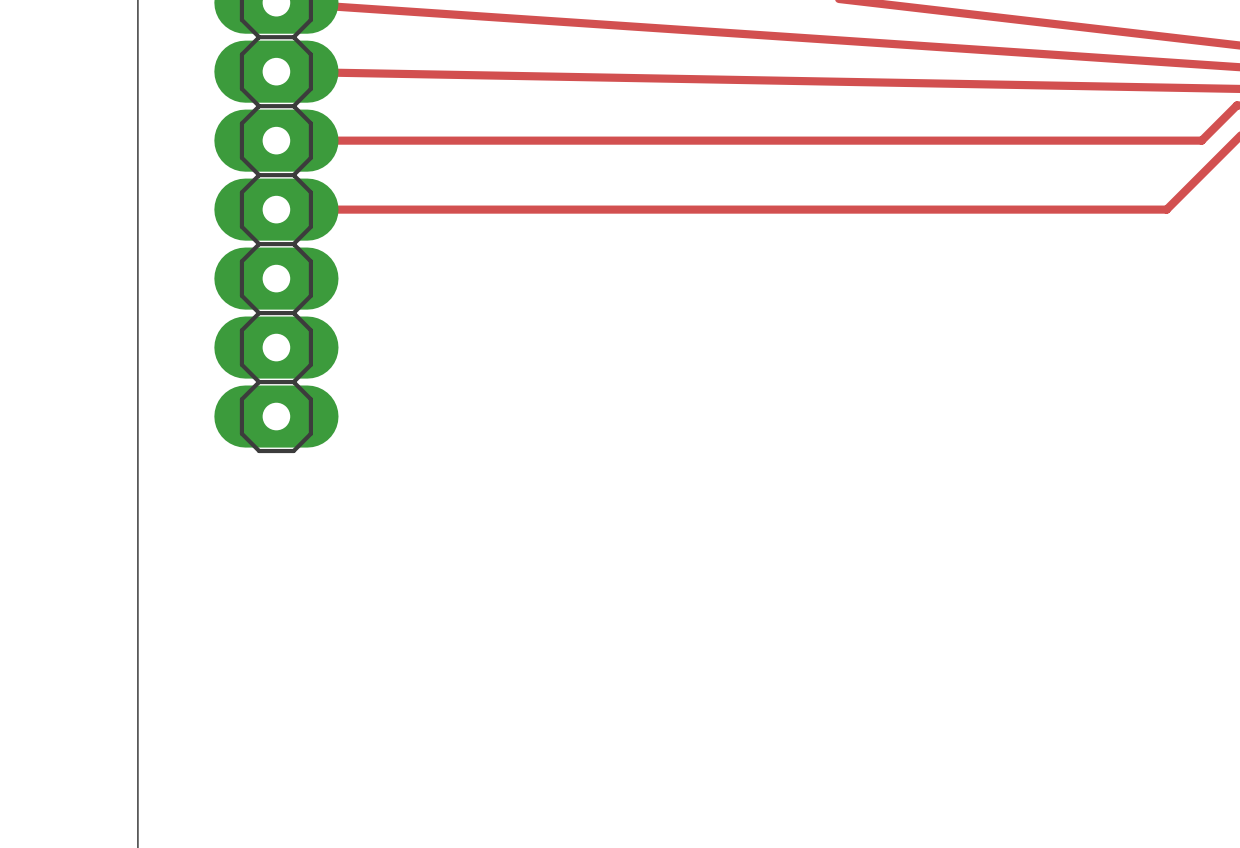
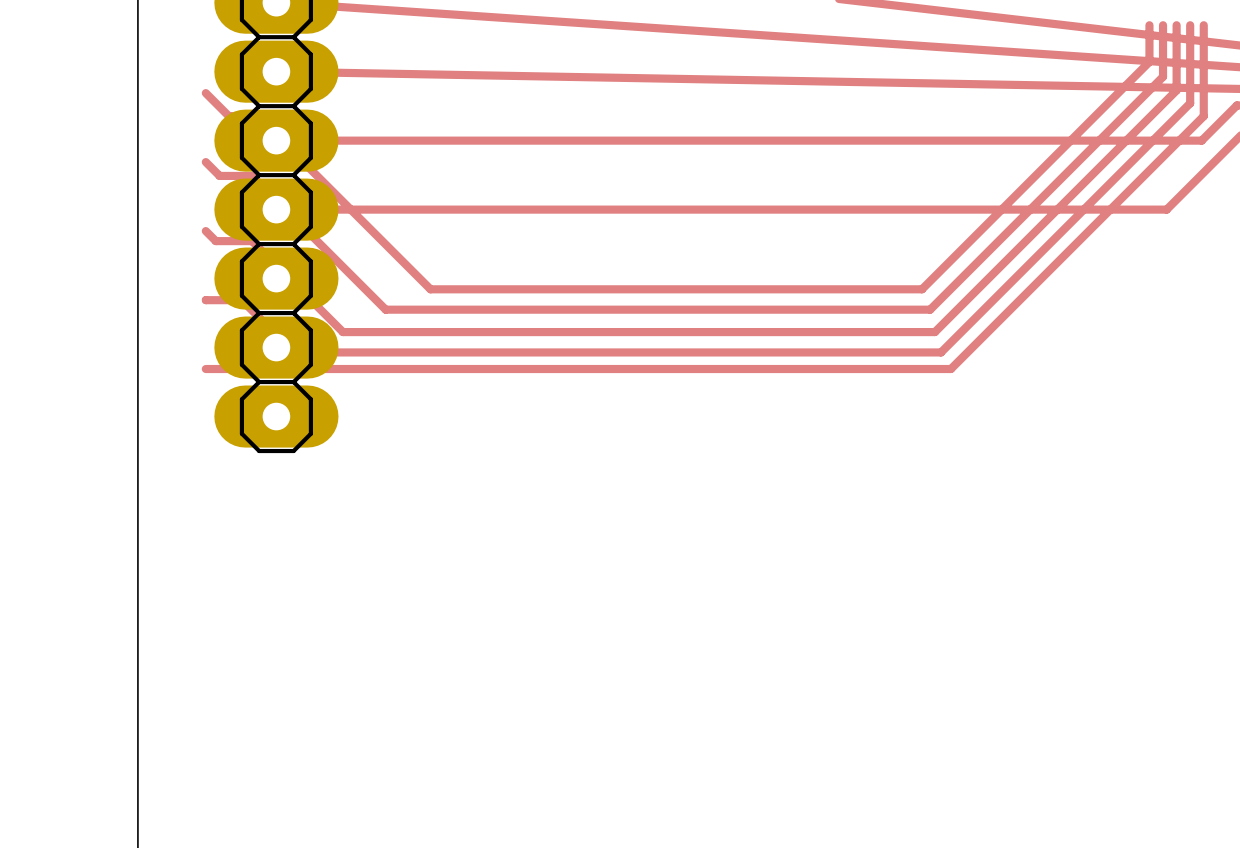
track: none -> (1149, 25) (1149, 61) (922, 289) (430, 289) (257, 116) (228, 116) (205, 93)
track: none -> (1163, 25) (1163, 76) (930, 309) (385, 309) (251, 175) (219, 175) (205, 162)
track: none -> (1176, 25) (1176, 90) (934, 332) (342, 332) (251, 241) (215, 241) (205, 231)
track: none -> (1190, 25) (1190, 103) (941, 352) (294, 352) (241, 300) (205, 300)
track: none -> (1203, 25) (1203, 116) (950, 369) (205, 369)

